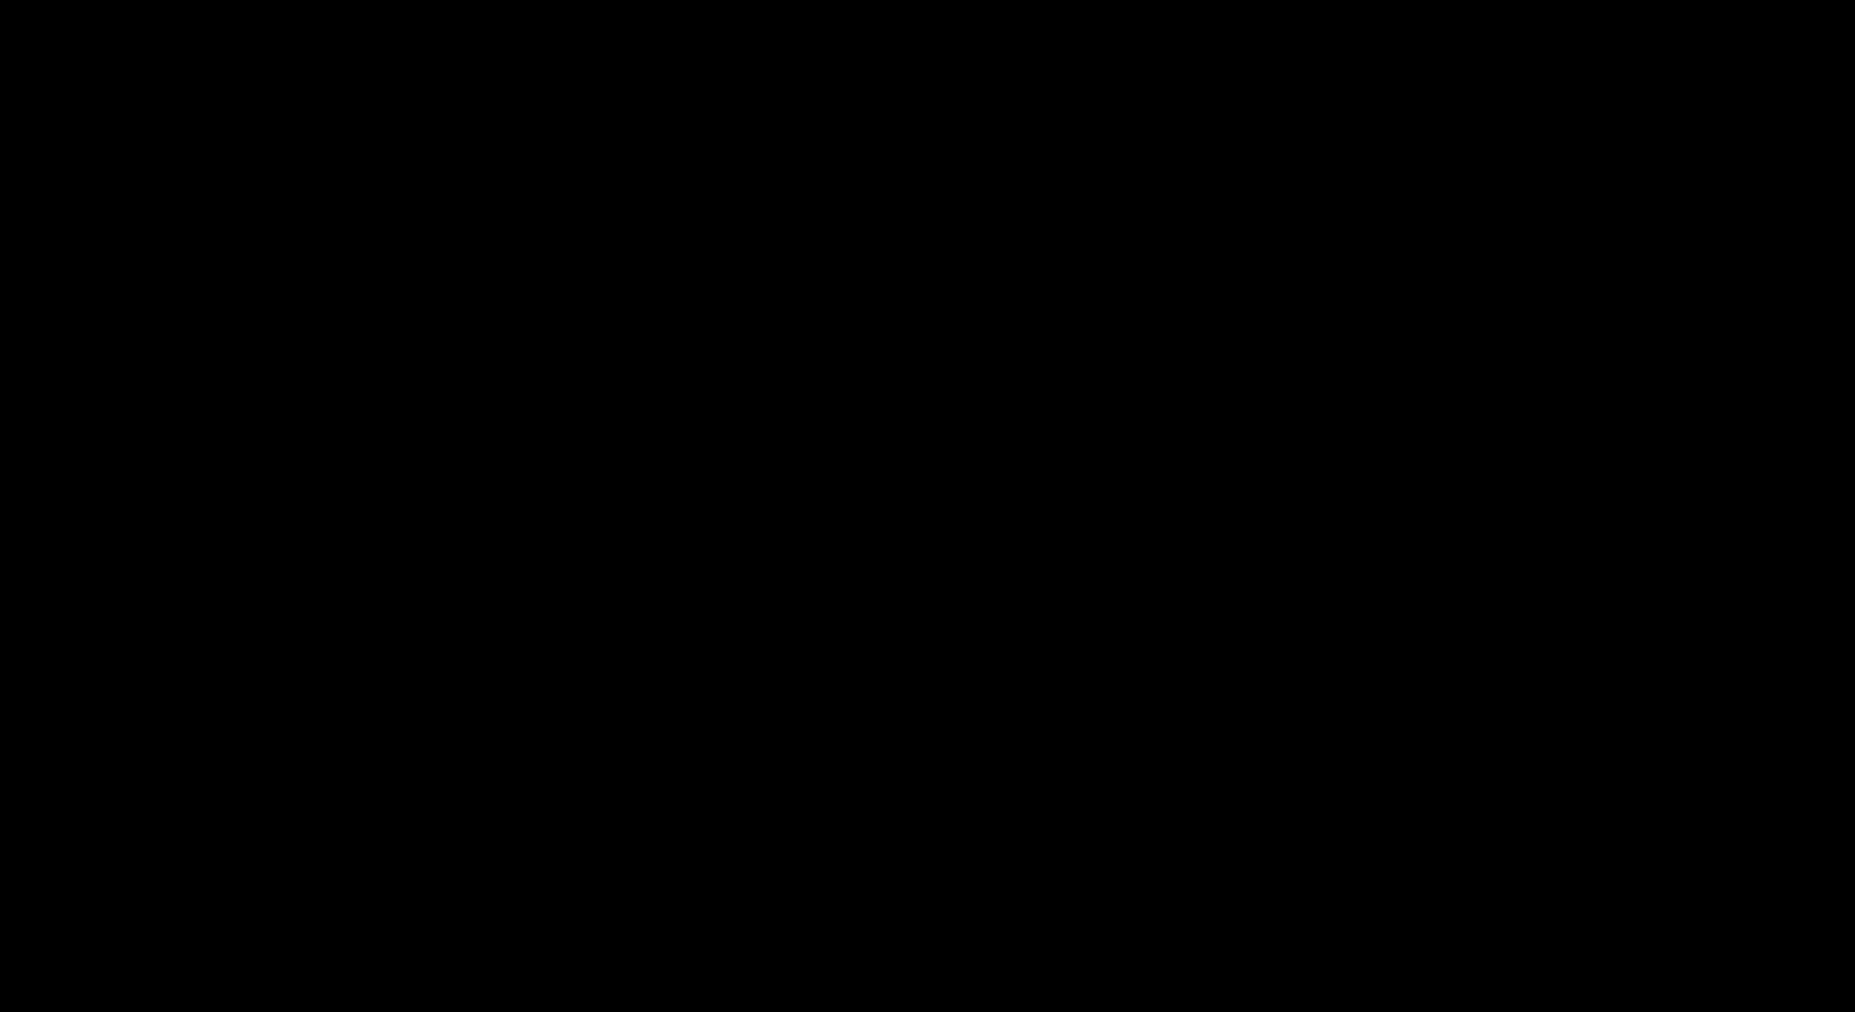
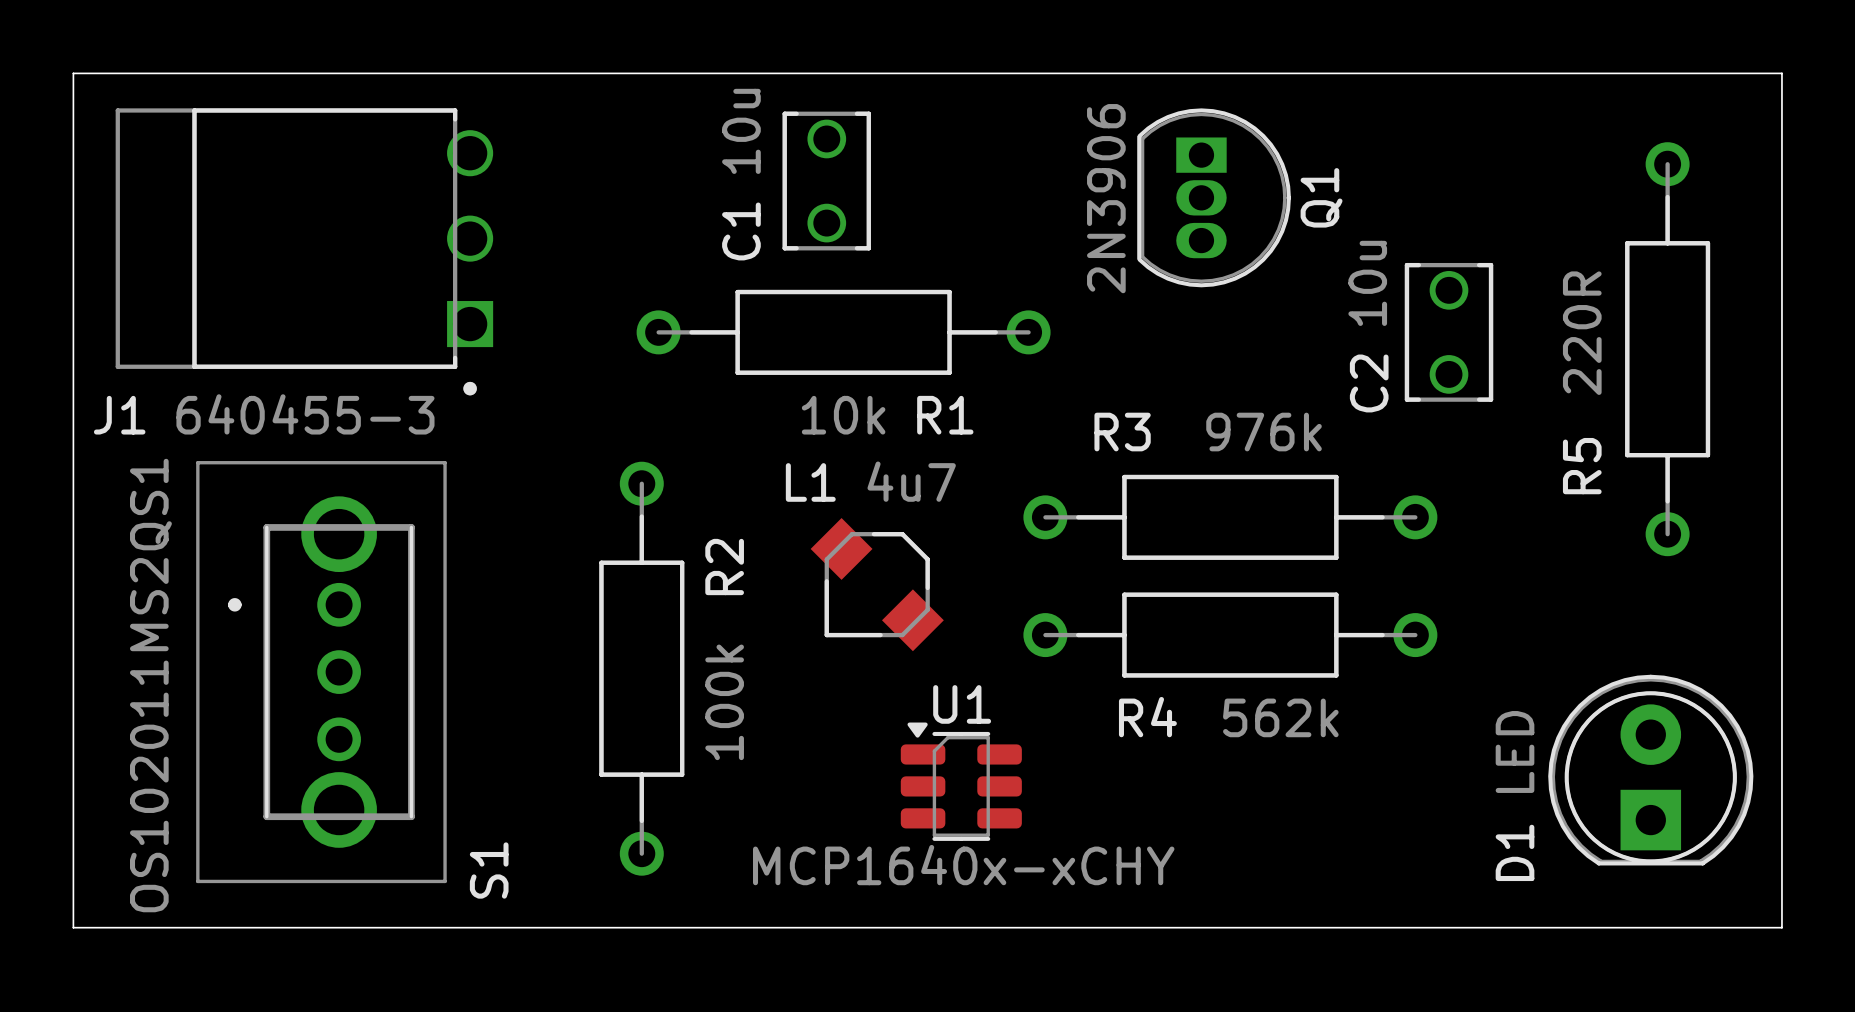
board edge: none -> (73, 73) (1781, 73) (1781, 927) (73, 927) (73, 73)
C1: none -> 10u (826, 181)
Q1: none -> 2N3906 (1214, 197)
J1: none -> 640455-3 (304, 251)
R1: none -> 10k (843, 332)
C2: none -> 10u (1449, 332)
R5: none -> 220R (1667, 349)
R3: none -> 976k (1230, 517)
L1: none -> 4u7 (877, 584)
R4: none -> 562k (1230, 635)
R2: none -> 100k (641, 668)
S1: none -> OS102011MS2QS1 (321, 672)
D1: none -> LED (1650, 770)
U1: none -> MCP1640x-xCHY (961, 781)

